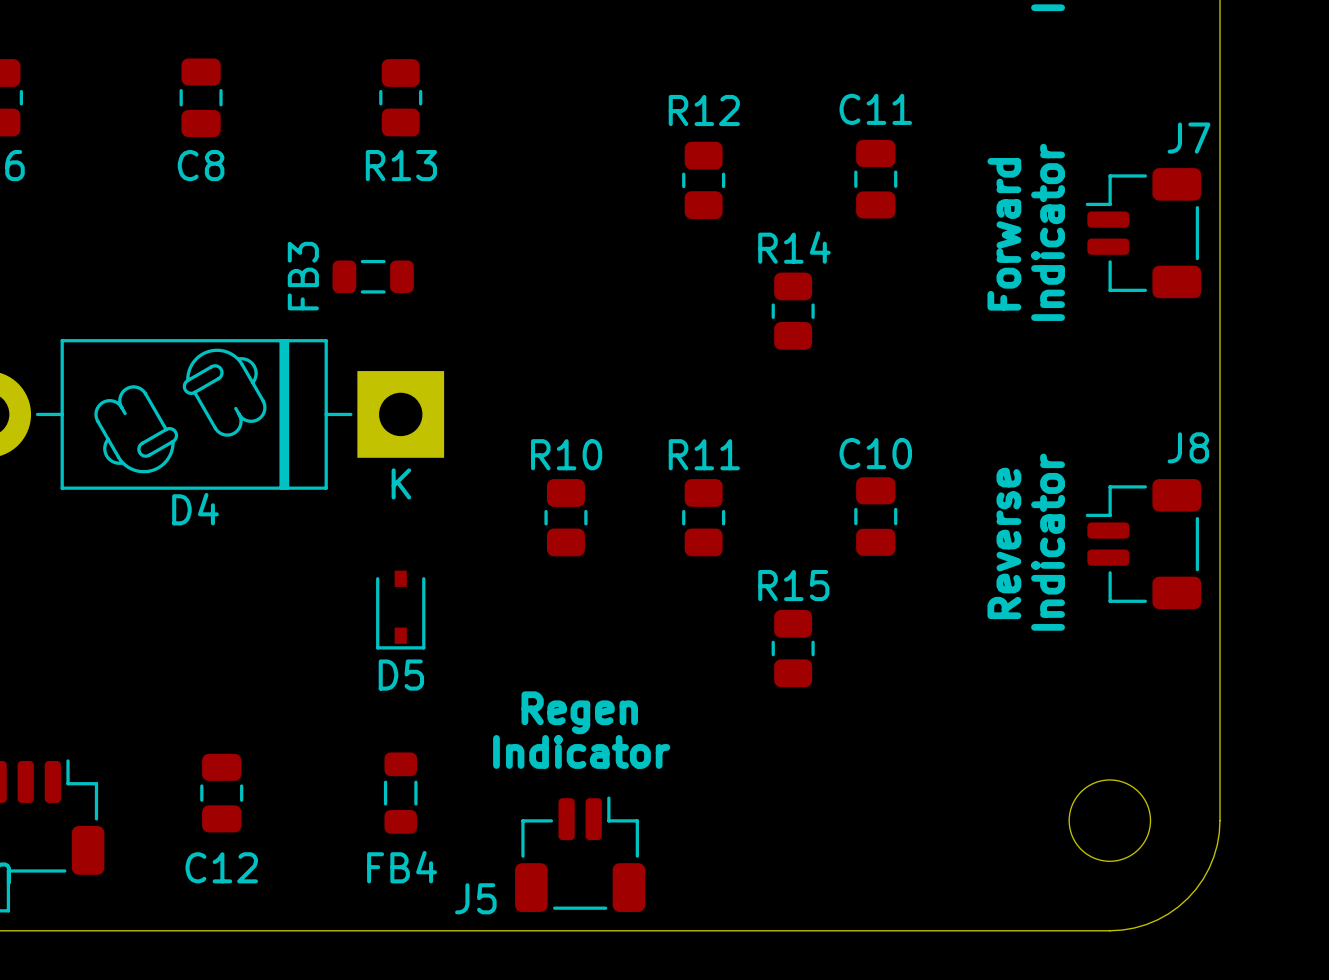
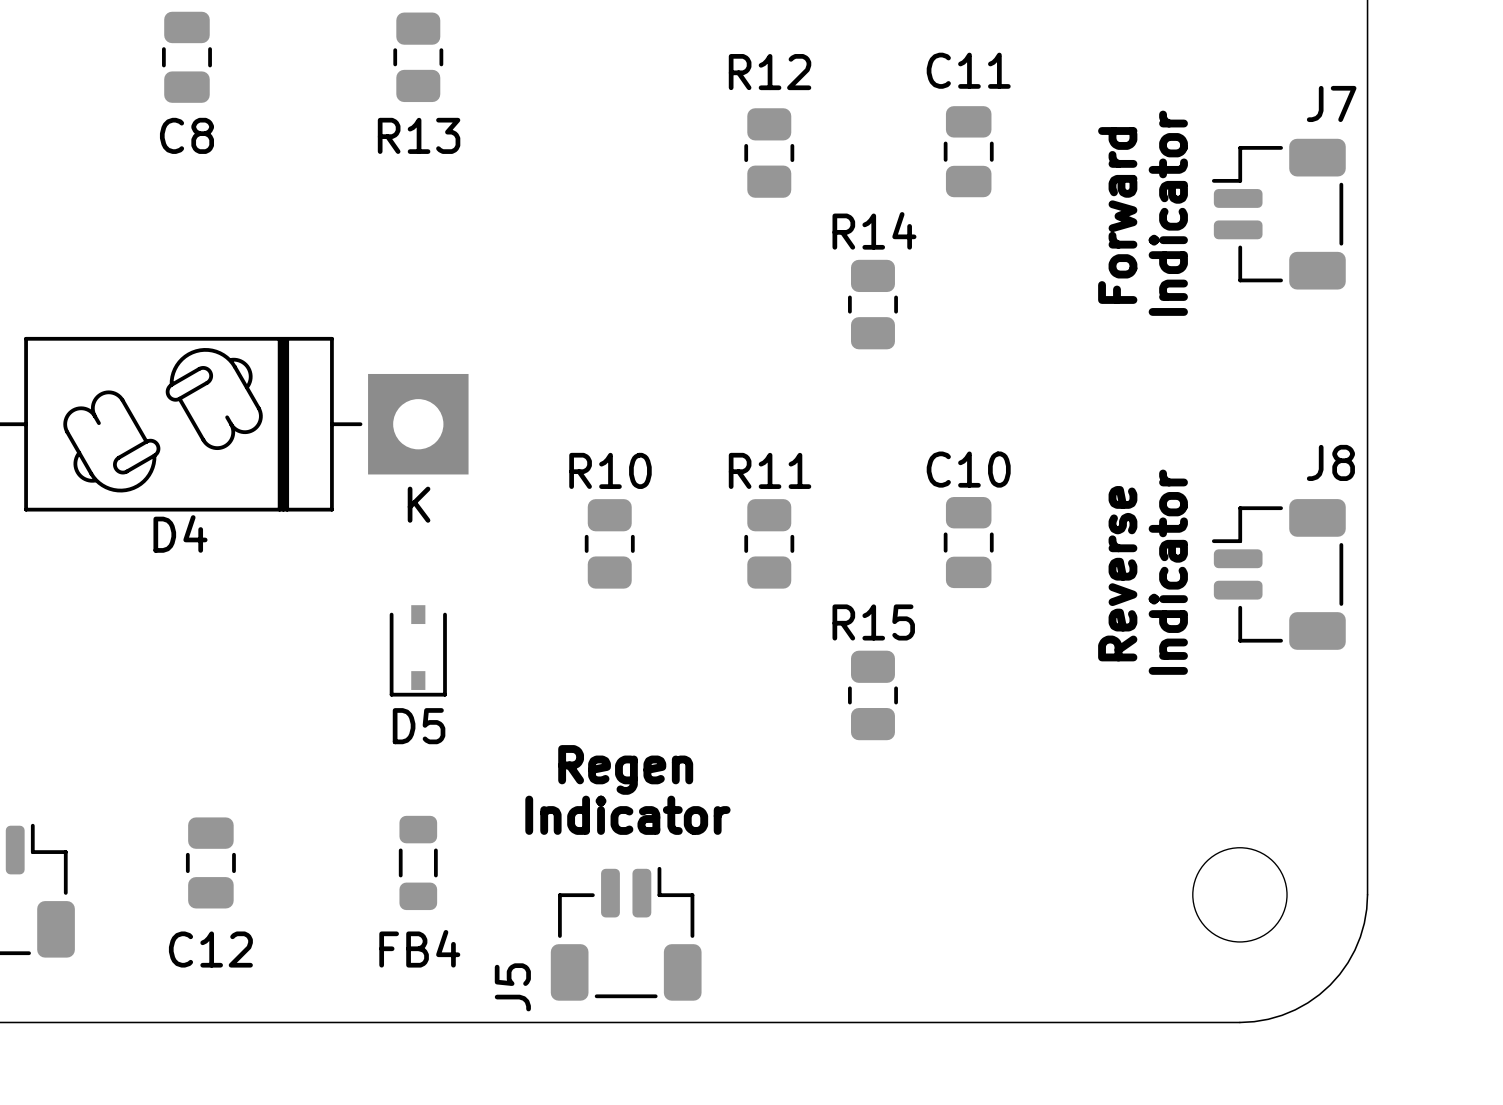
FB3: (373, 276) -> none
J5 name rotation: 0° (475, 898) -> 90° counterclockwise (512, 987)

